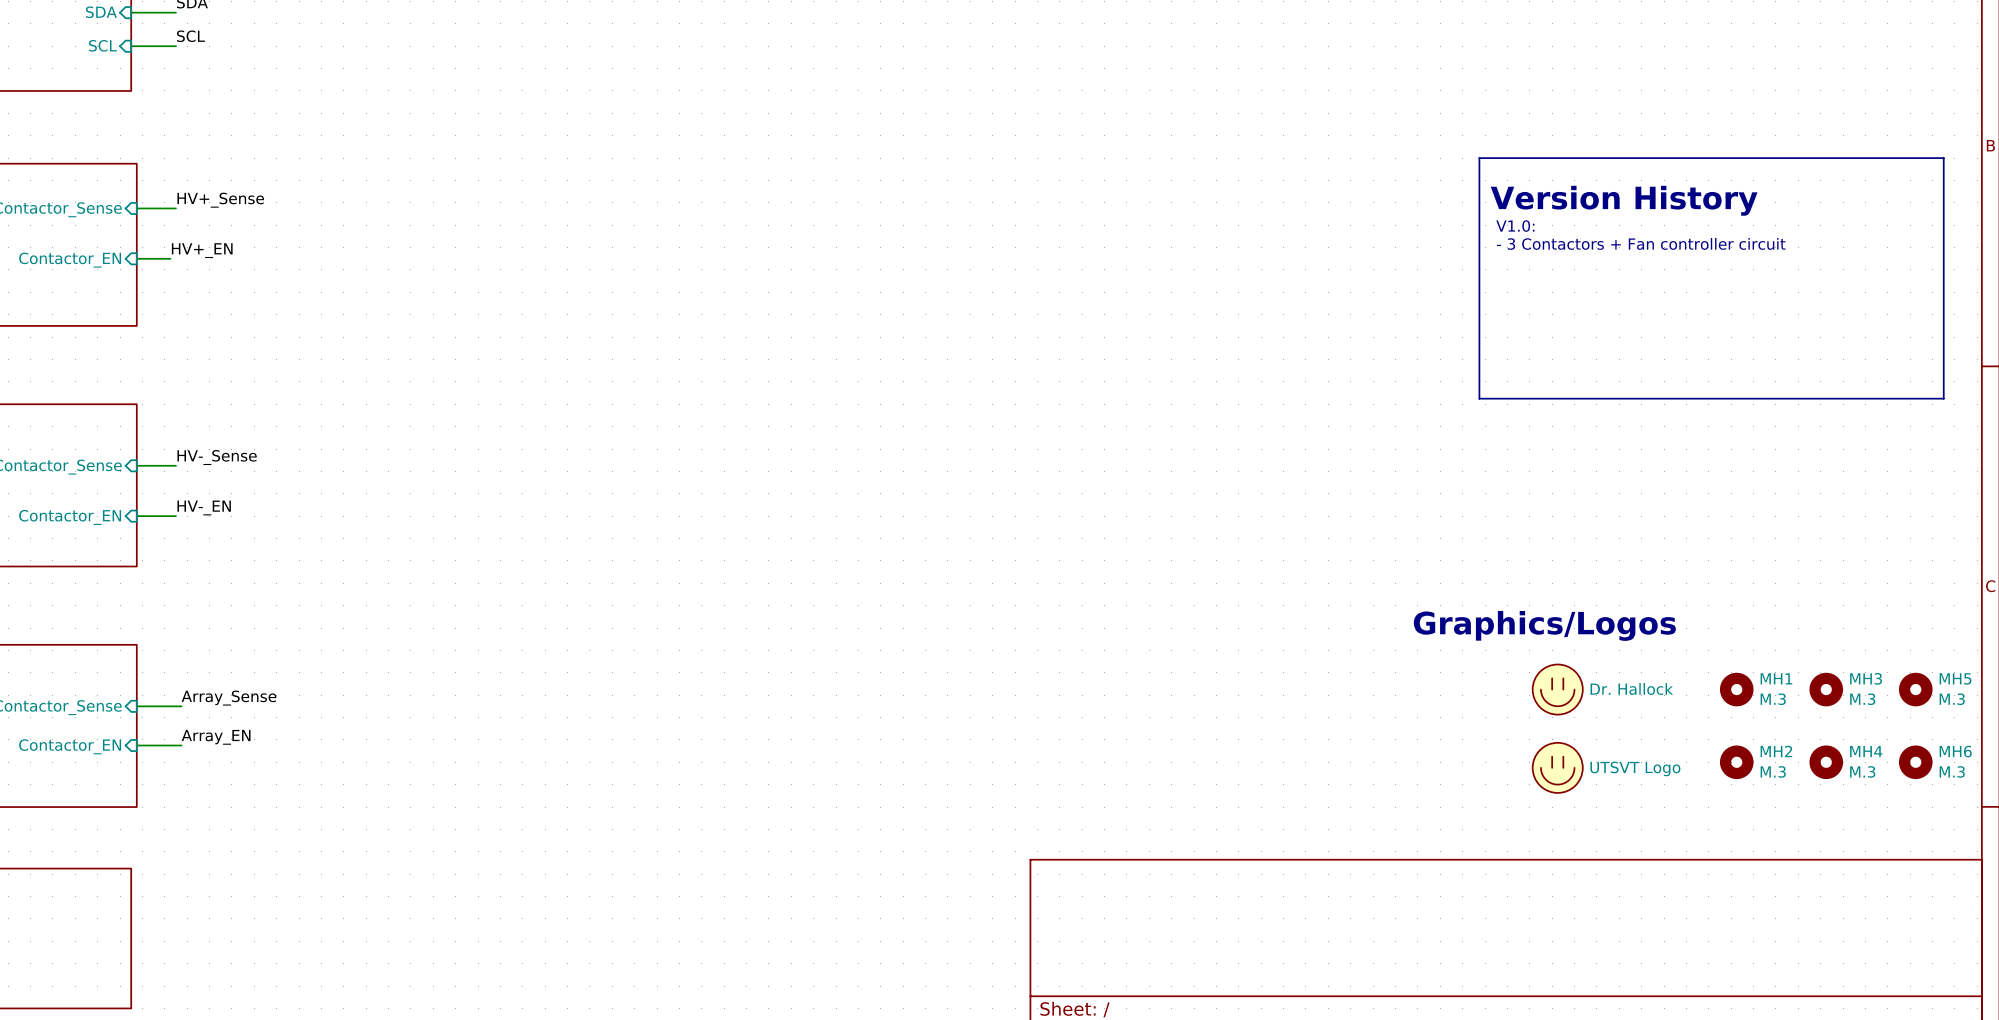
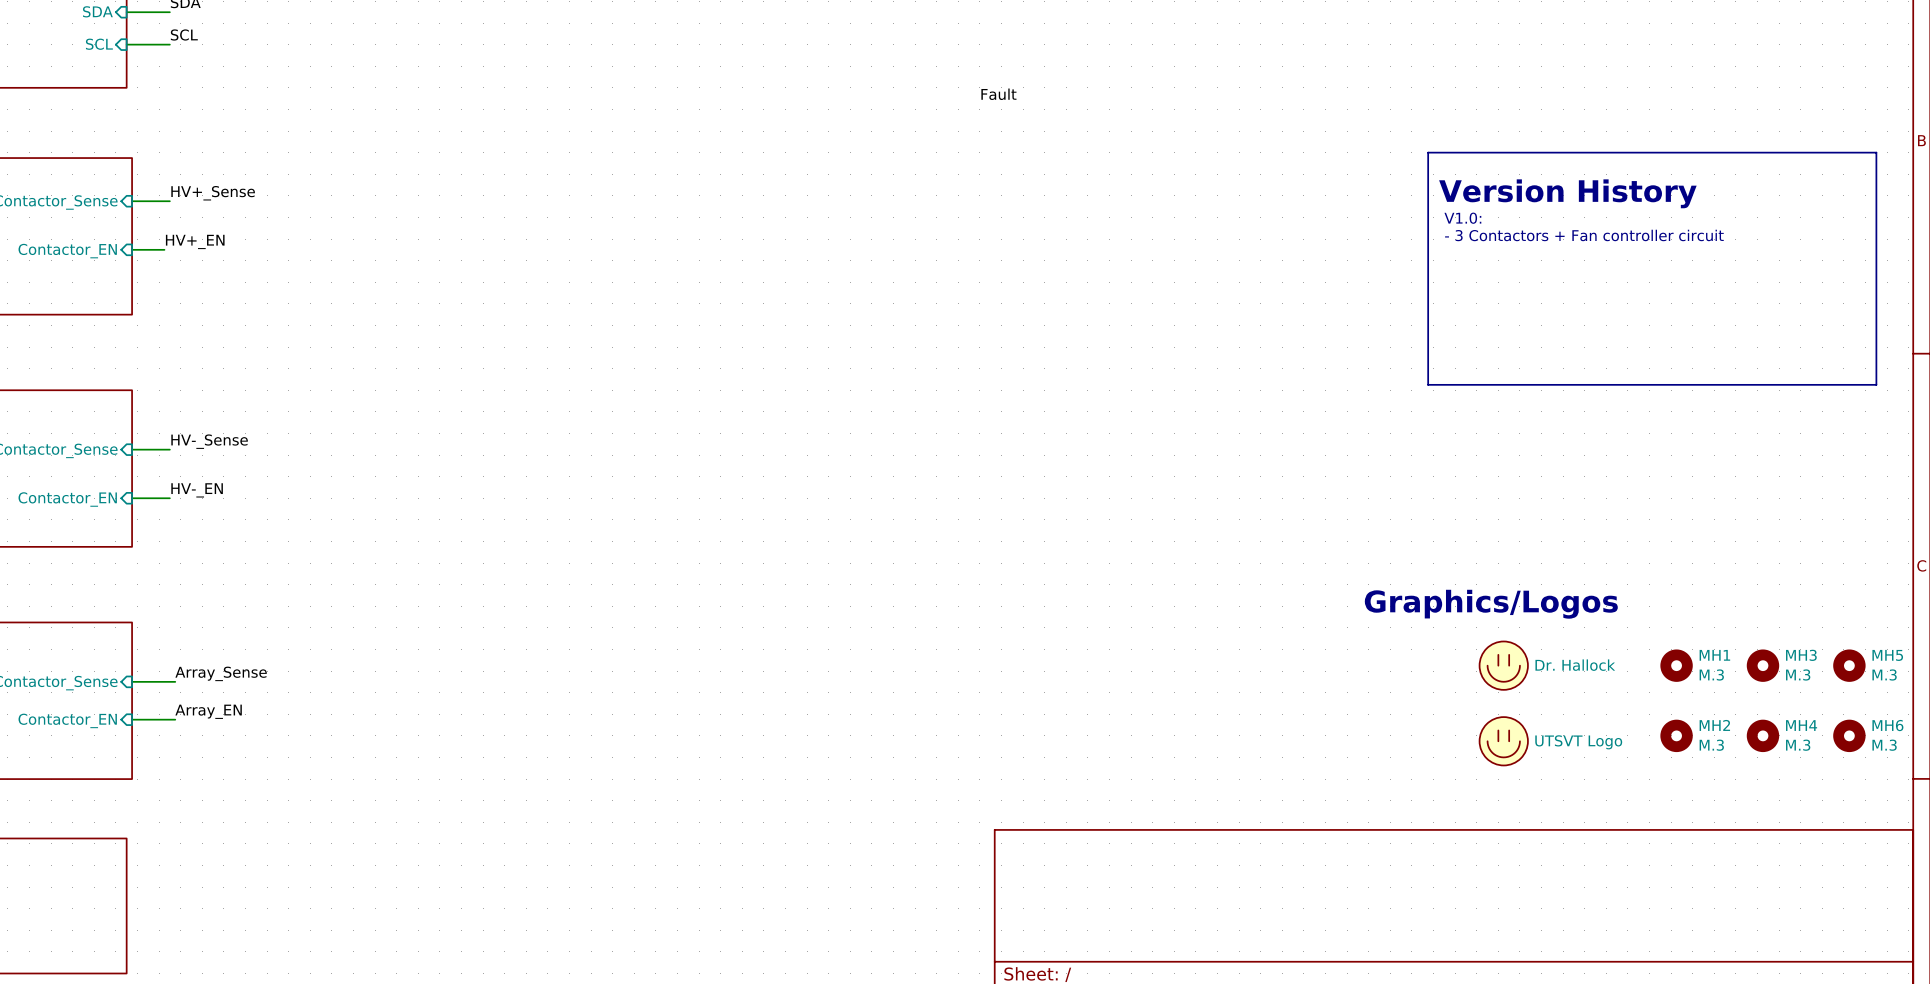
label: none -> Fault (998, 94)

